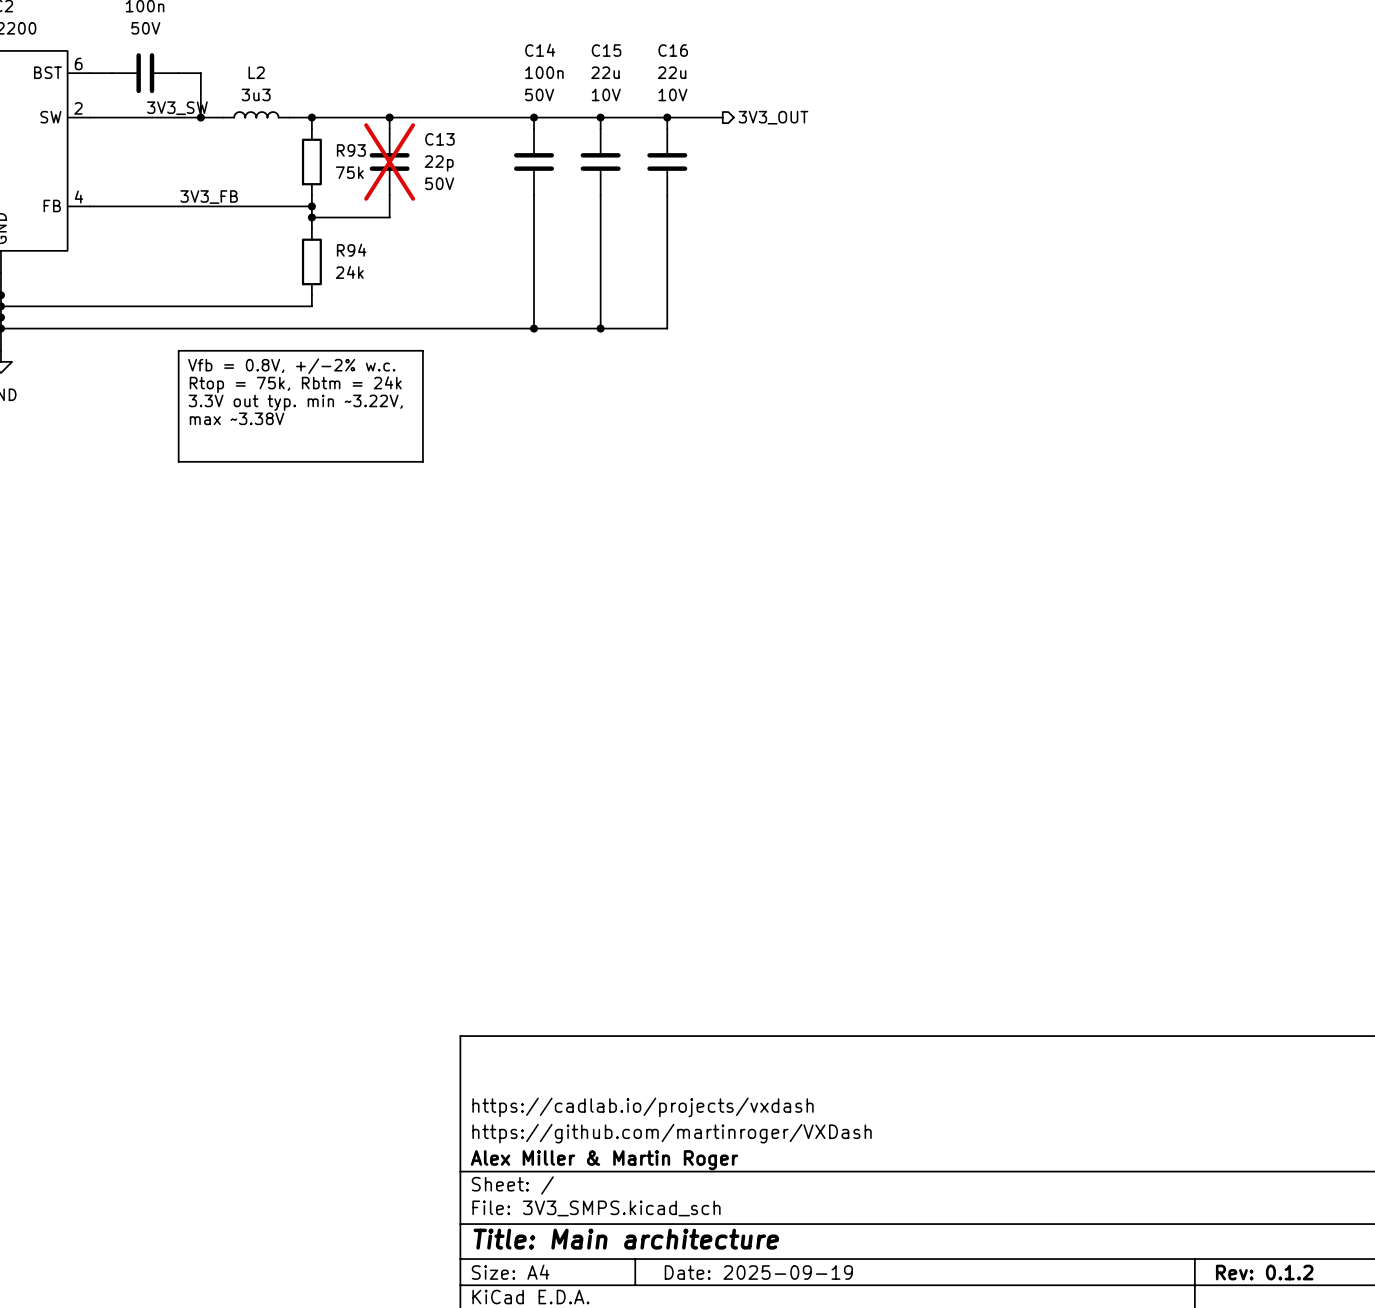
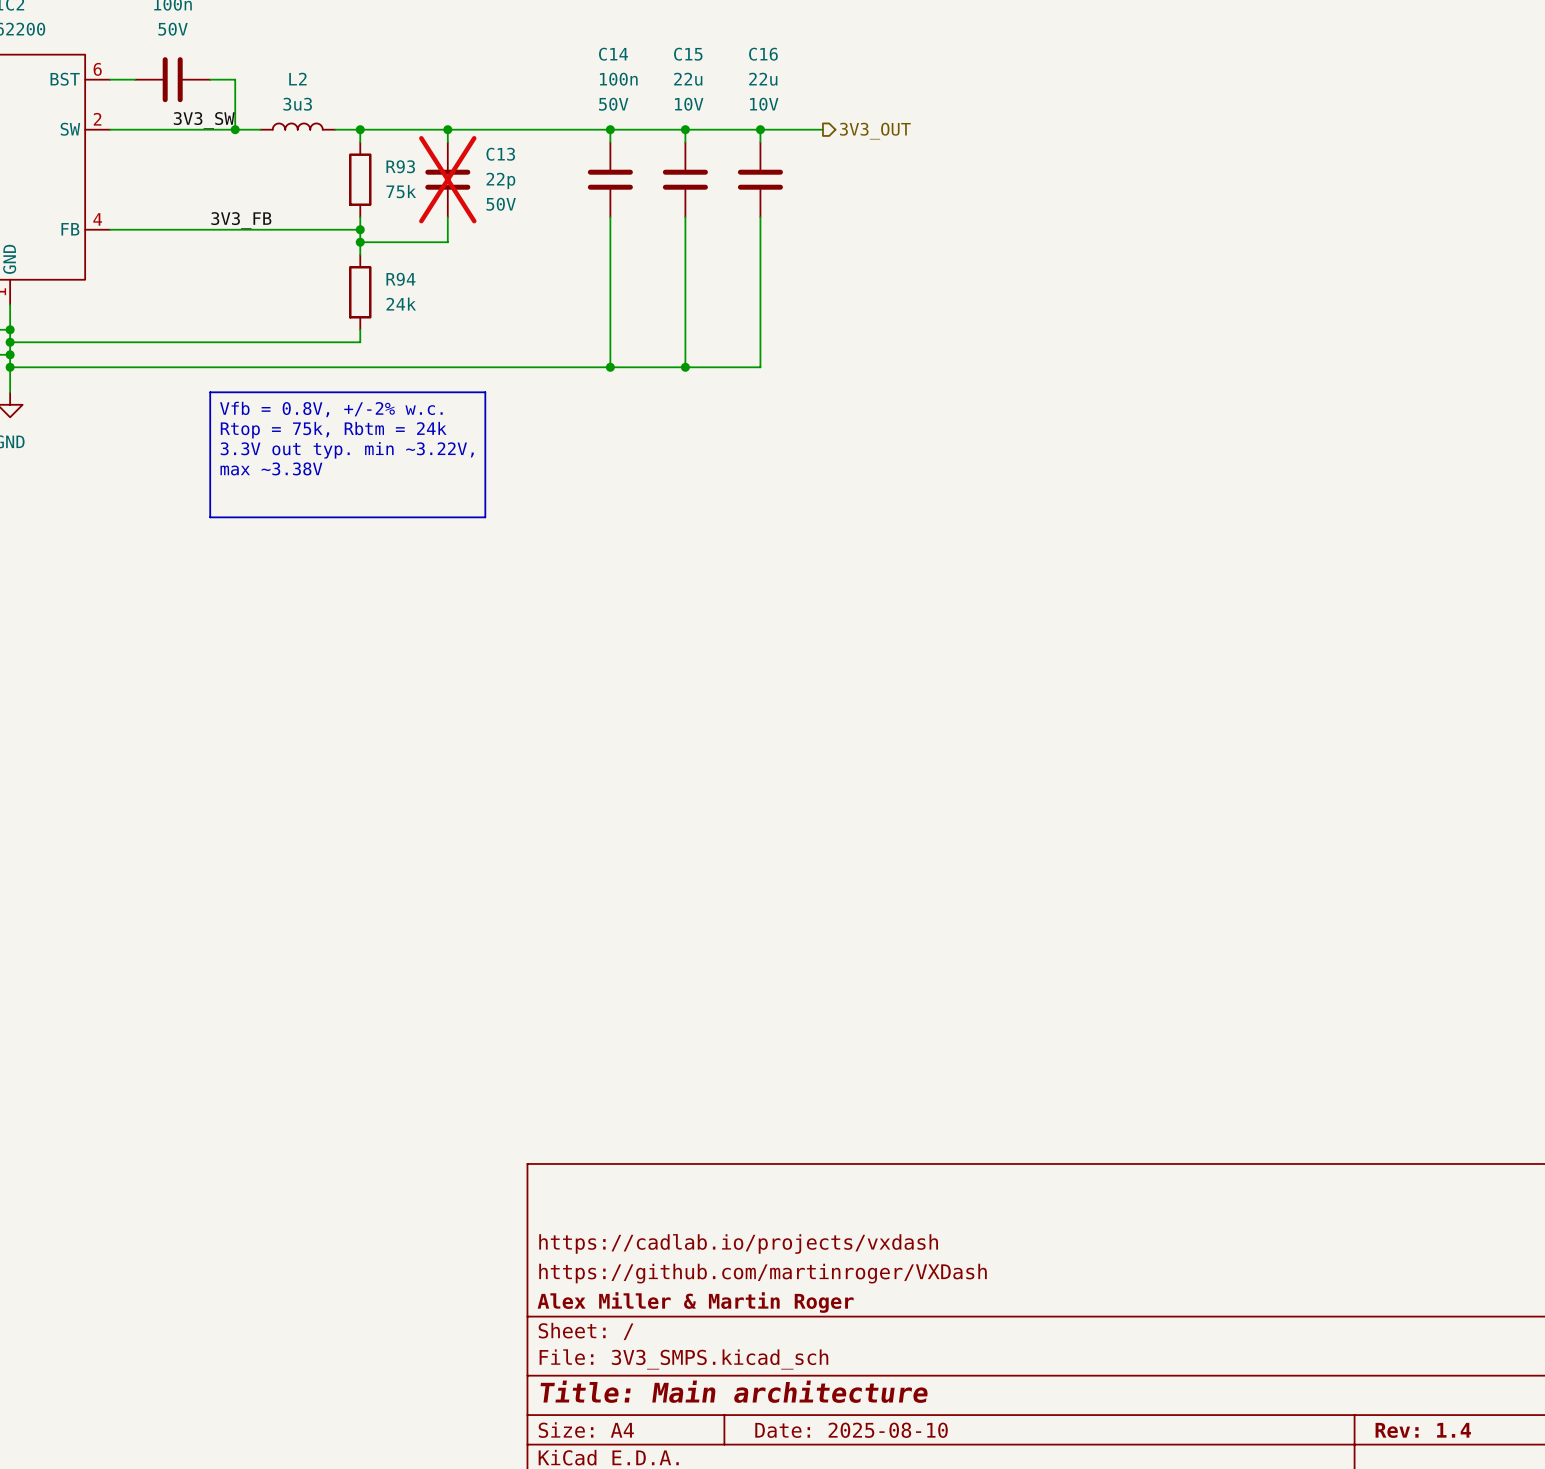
title block: Date: 2025-09-19 (758, 1272) -> Date: 2025-08-10 (851, 1430)
title block: Rev: 0.1.2 (1264, 1272) -> Rev: 1.4 (1423, 1430)

